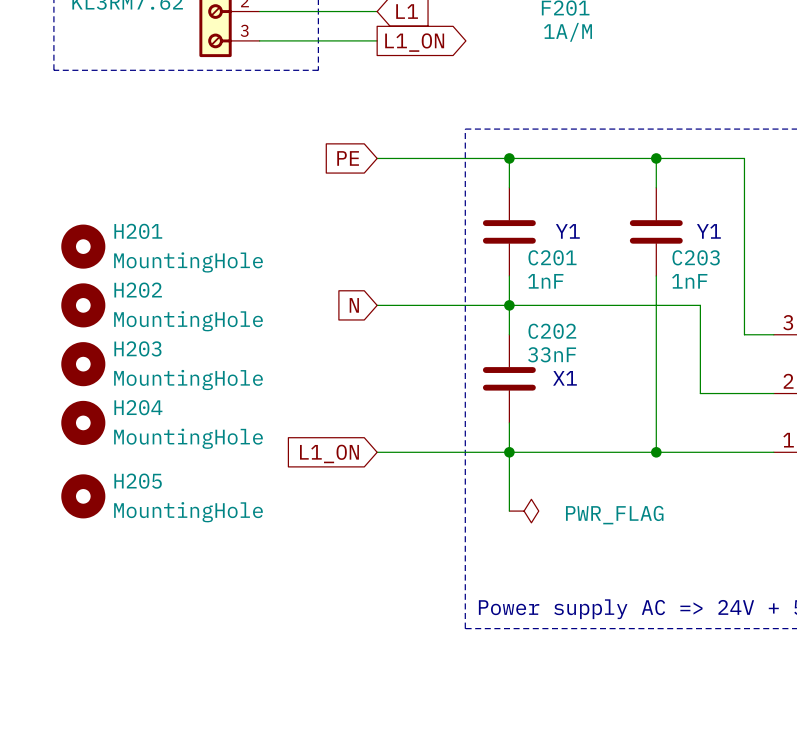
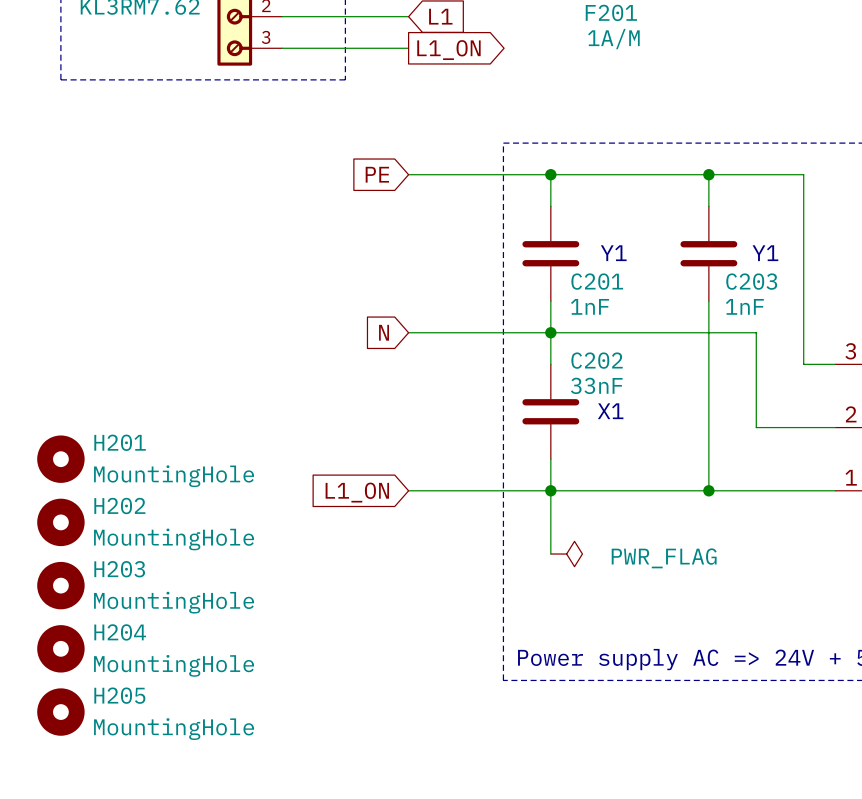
H201 position: (83, 246) -> (60, 459)
H202 position: (83, 305) -> (60, 522)
H203 position: (83, 364) -> (60, 585)
H204 position: (83, 422) -> (60, 648)
H205 position: (83, 496) -> (60, 712)

